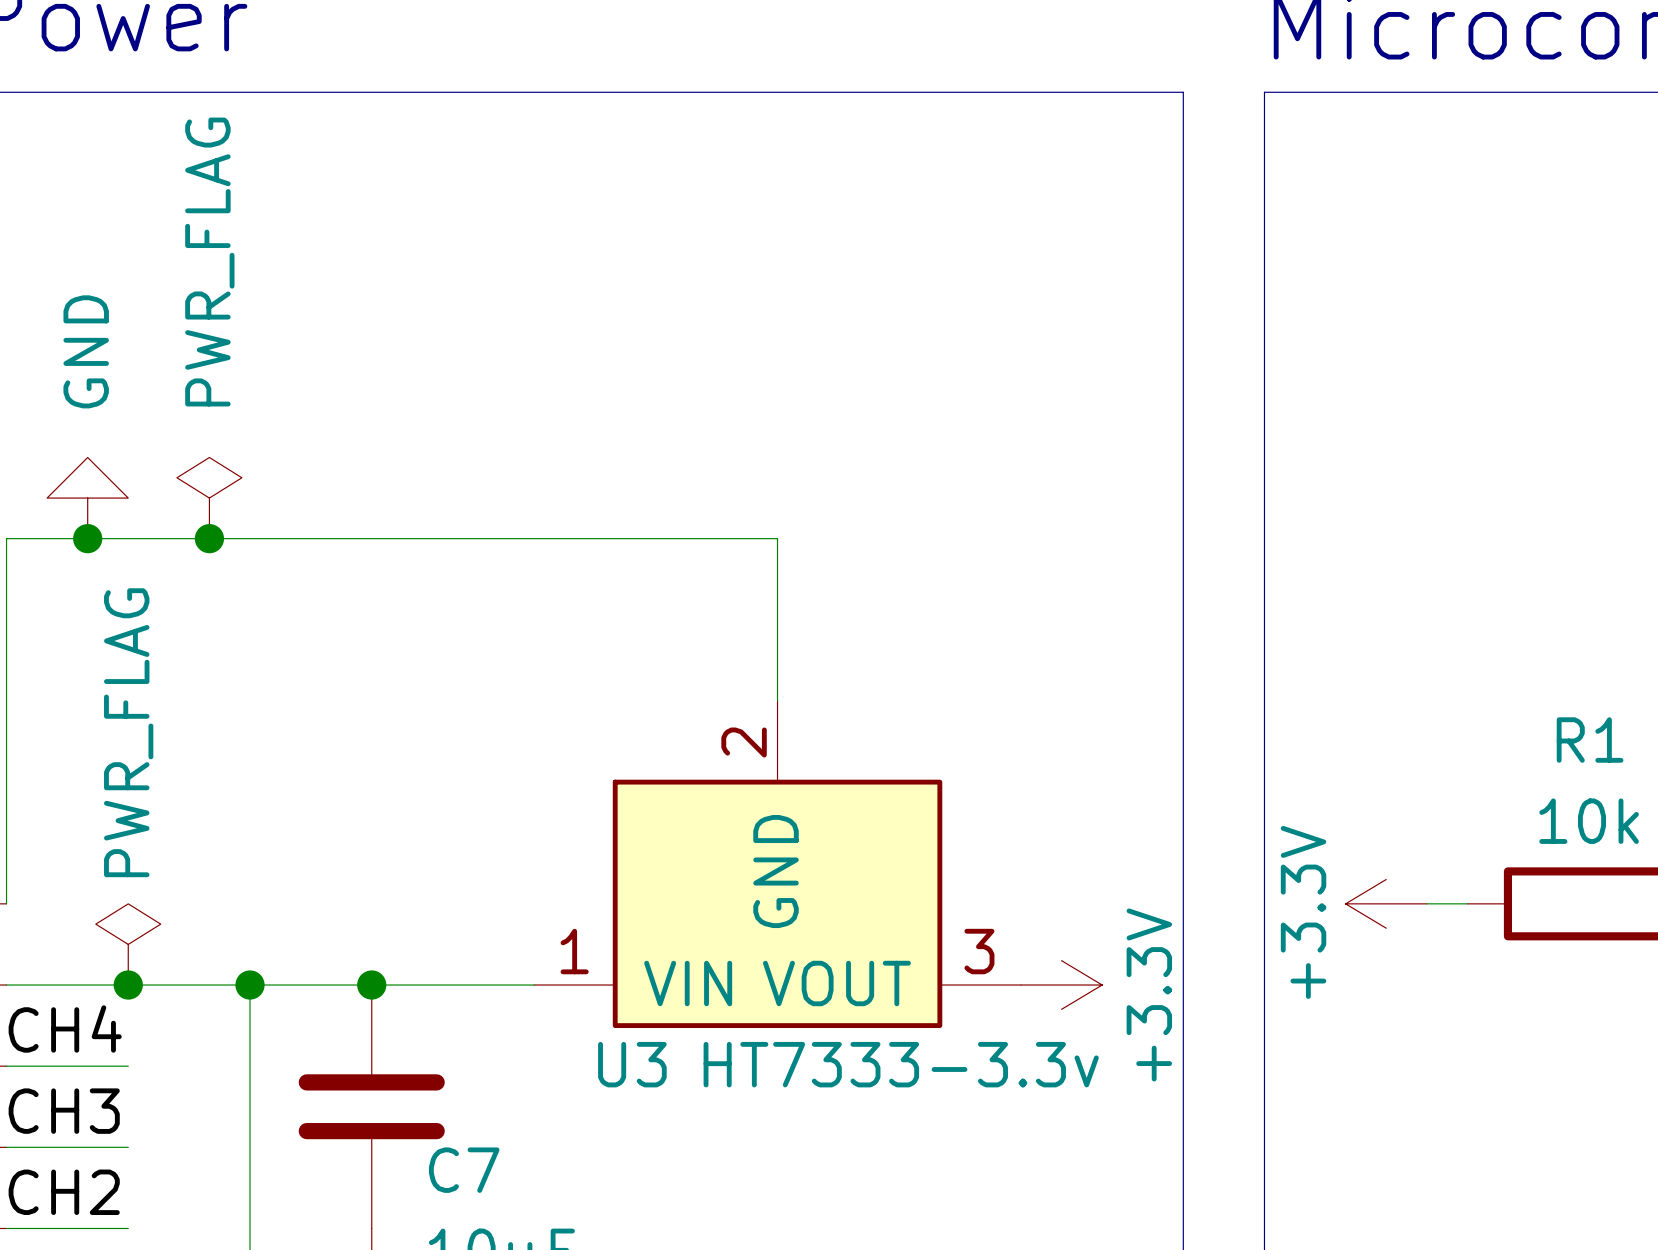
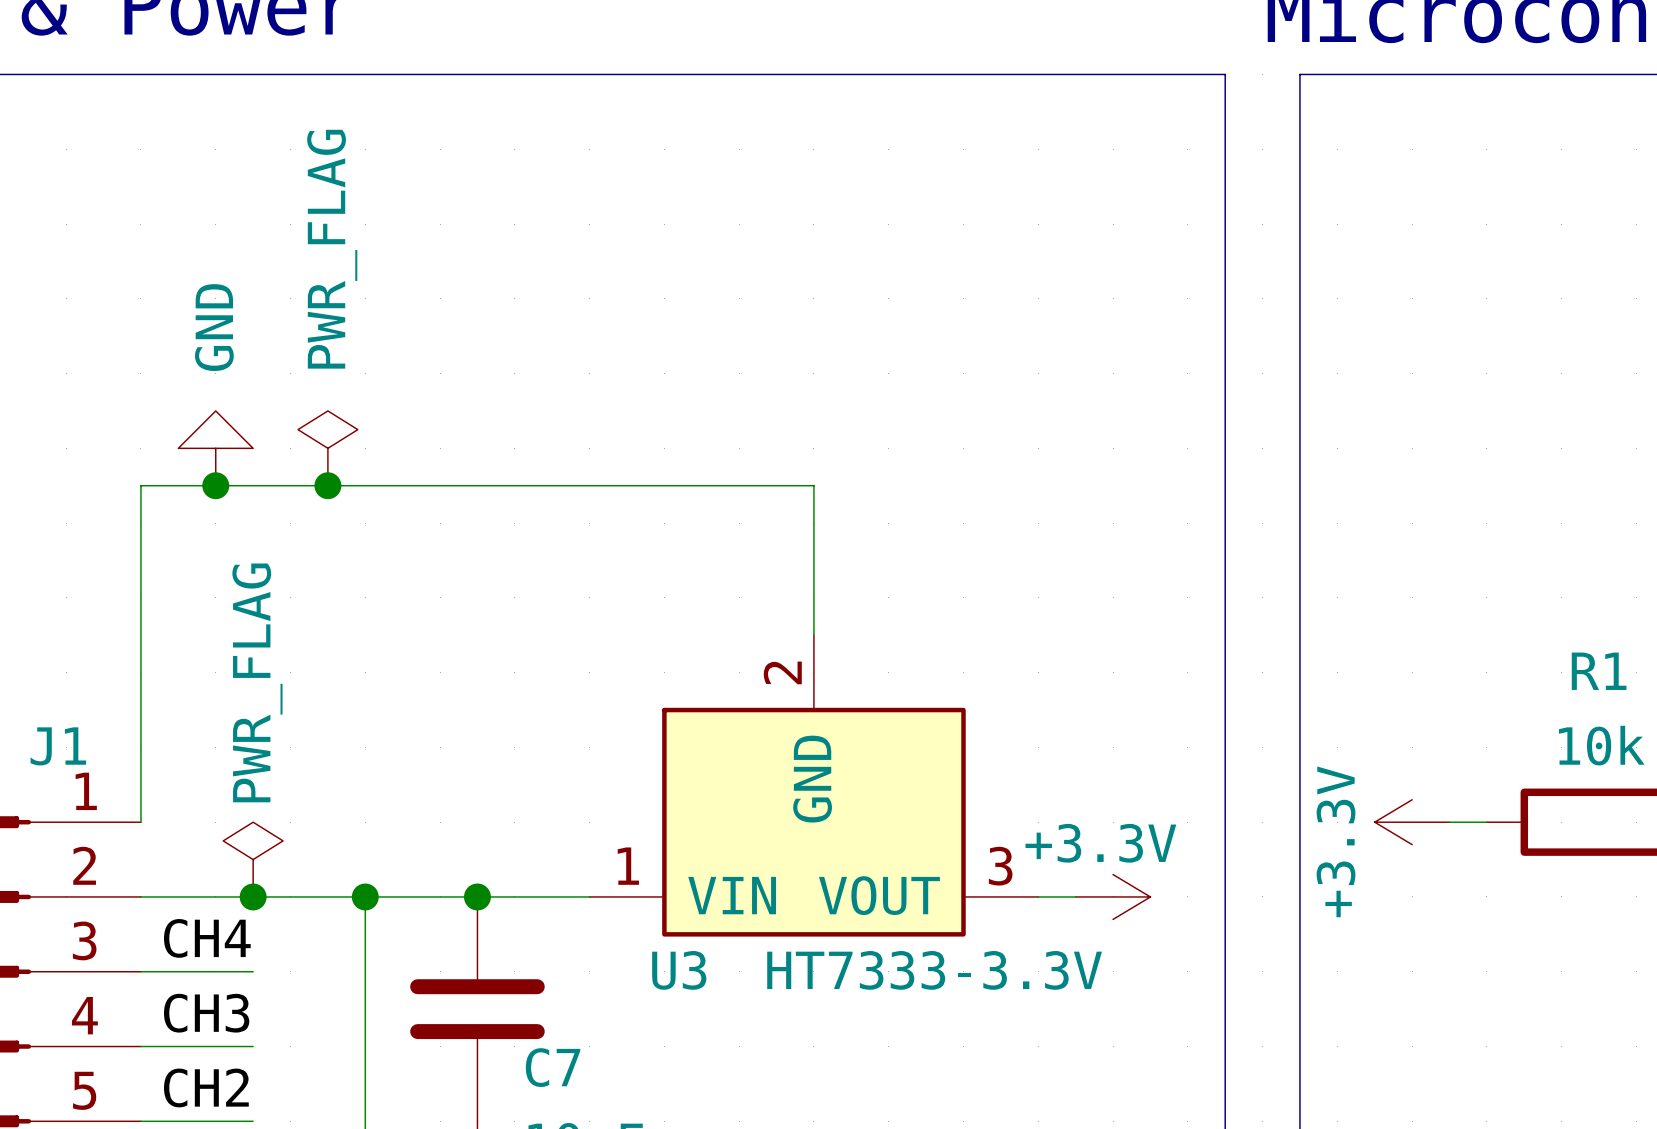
wire: (736, 538) (777, 538) (777, 700) -> (813, 485) (813, 635)
U3 position: (777, 864) -> (813, 785)
power symbol text rotation: 0° (1149, 994) -> 90° clockwise (1100, 843)
U3 value: HT7333-3.3v (901, 1064) -> HT7333-3.3V (934, 970)

